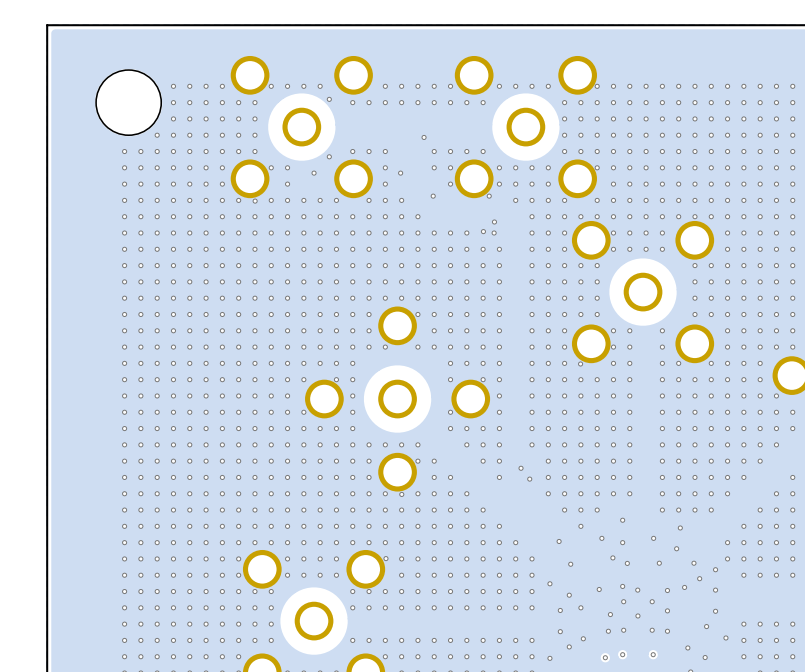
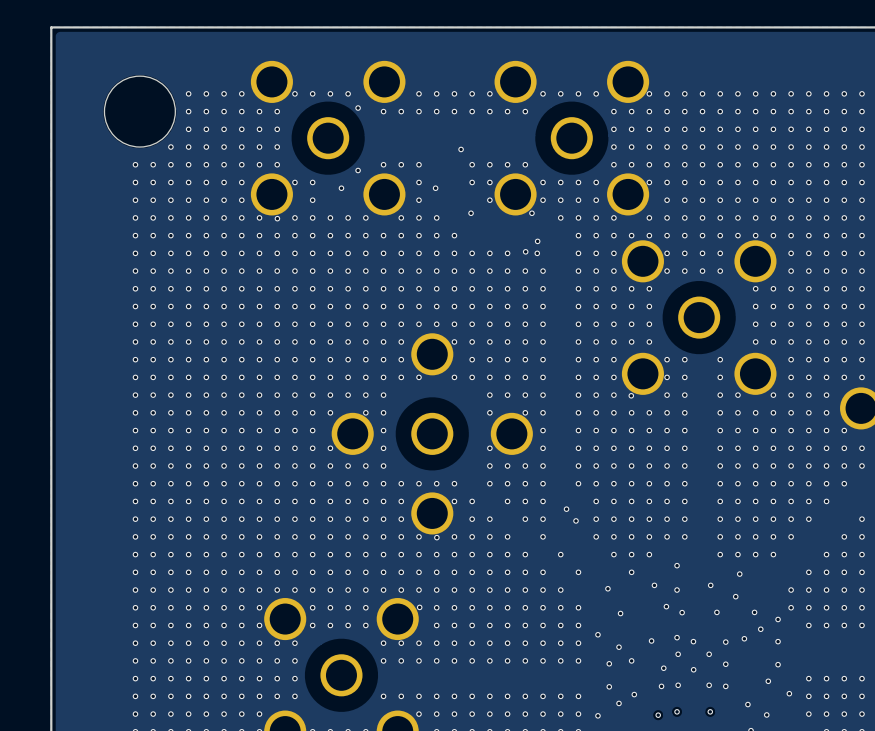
via: none -> (489, 483)
via: none -> (507, 501)
via: none -> (525, 519)
via: none -> (543, 536)
via: none -> (560, 554)
via: none -> (578, 572)

